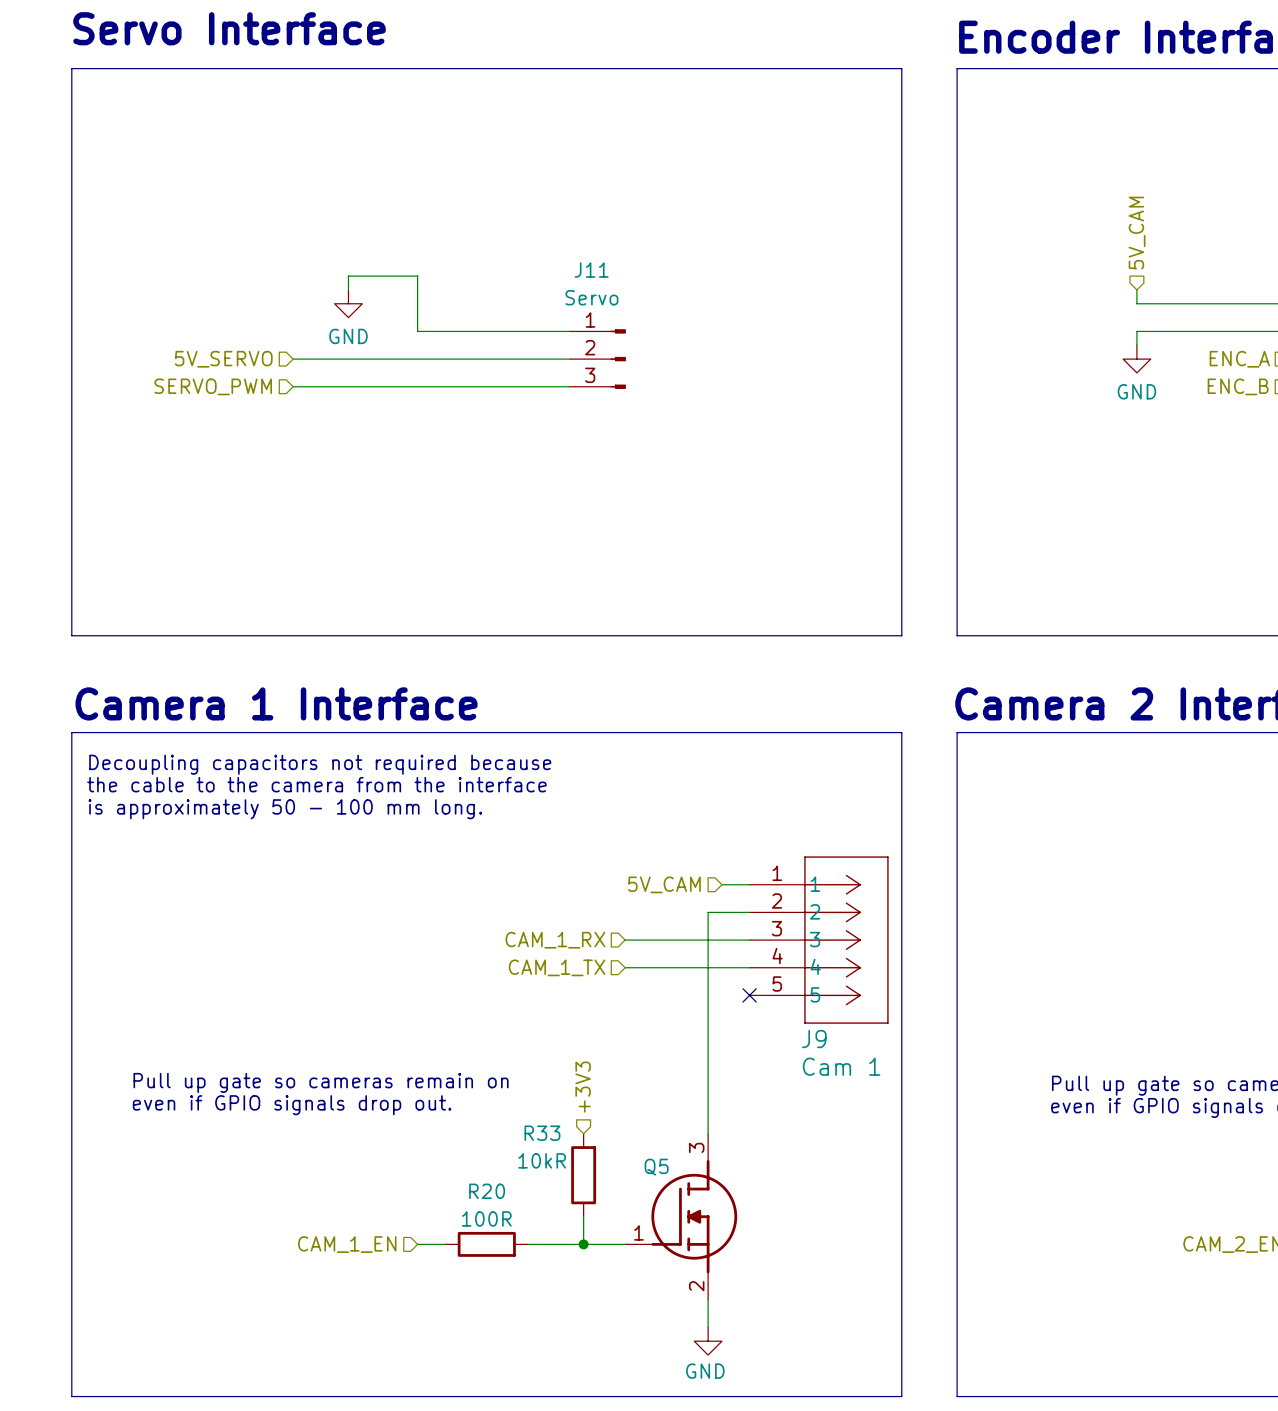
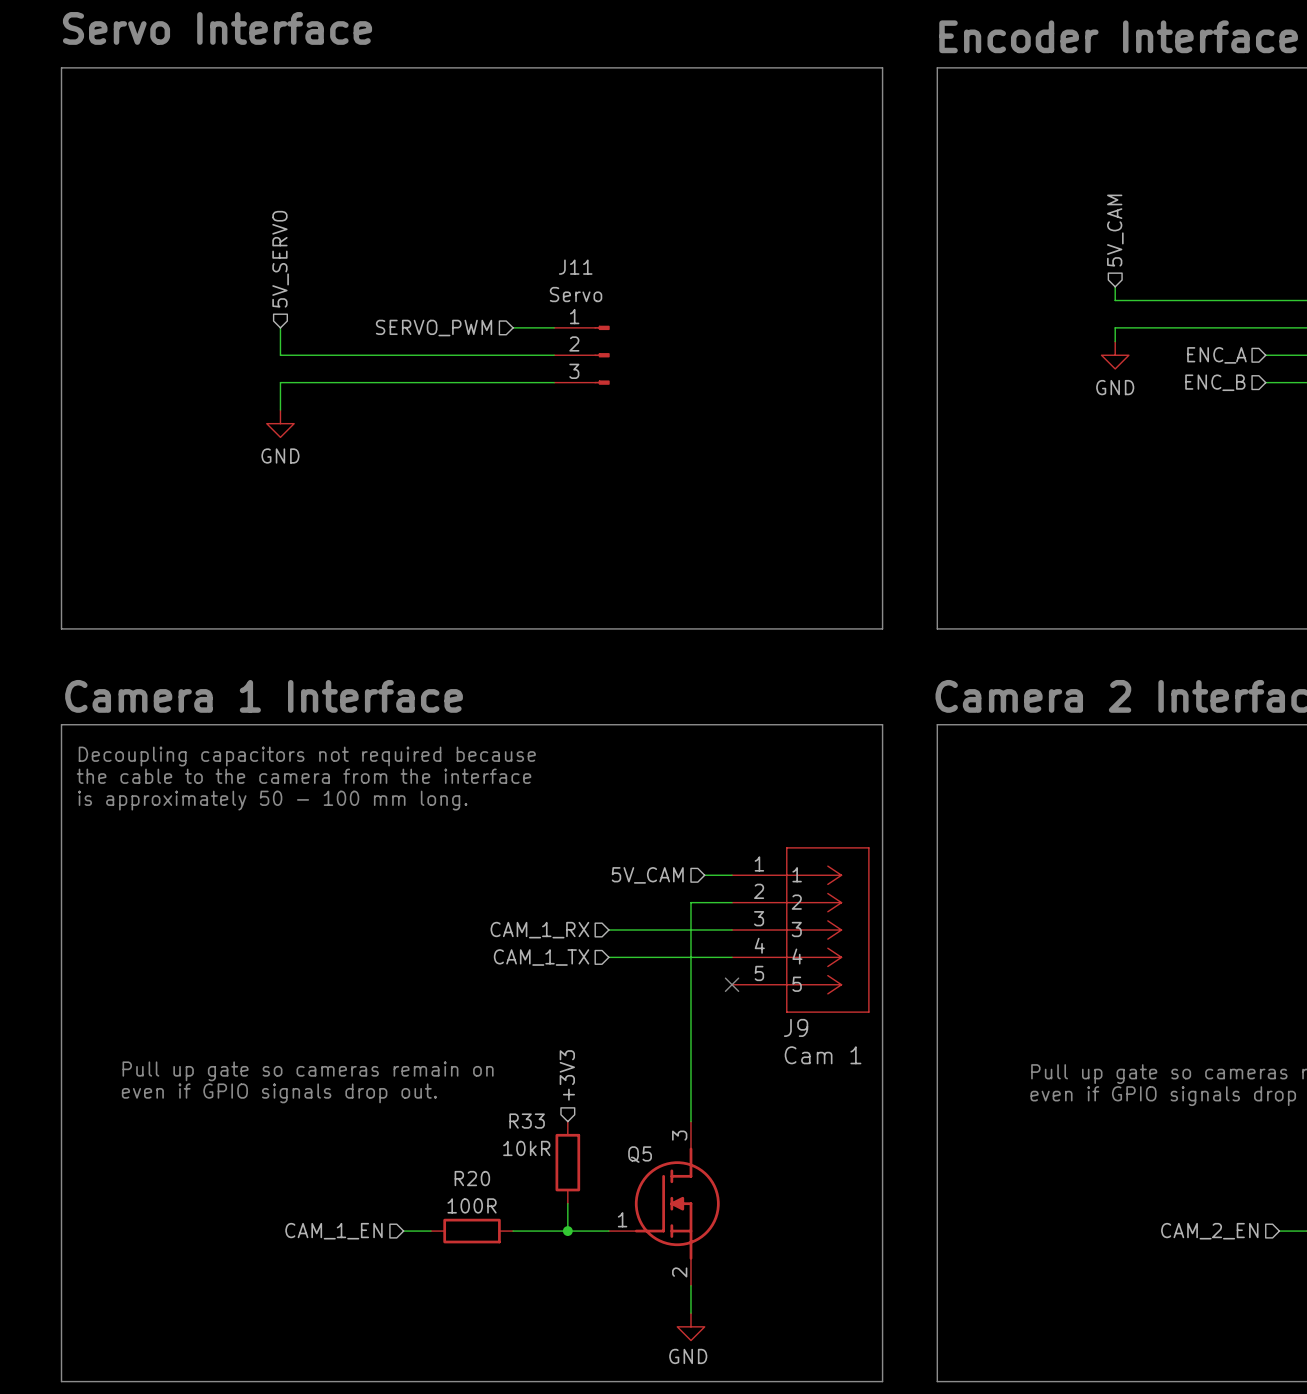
wire: (348, 289) (348, 276) (417, 276) (417, 331) (528, 331) -> none
power symbol position: GND (348, 303) -> GND (280, 423)
wire: none -> (280, 327) (280, 355)
hierarchical label rotation: 0° (223, 359) -> 90° clockwise (280, 259)
hierarchical label position: 5V_SERVO (223, 359) -> 5V_SERVO (280, 259)
hierarchical label position: SERVO_PWM (213, 386) -> SERVO_PWM (434, 328)
wire: none -> (280, 382) (280, 409)

